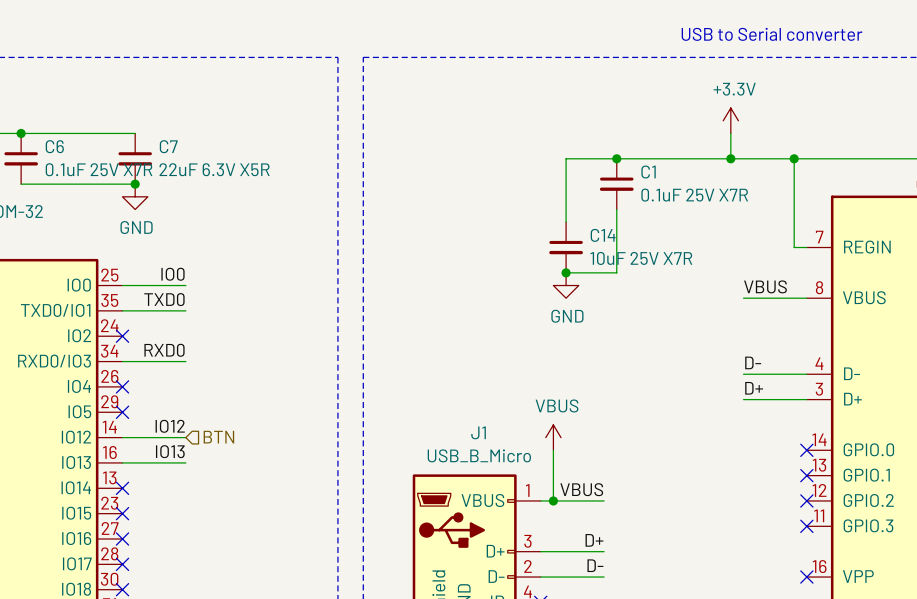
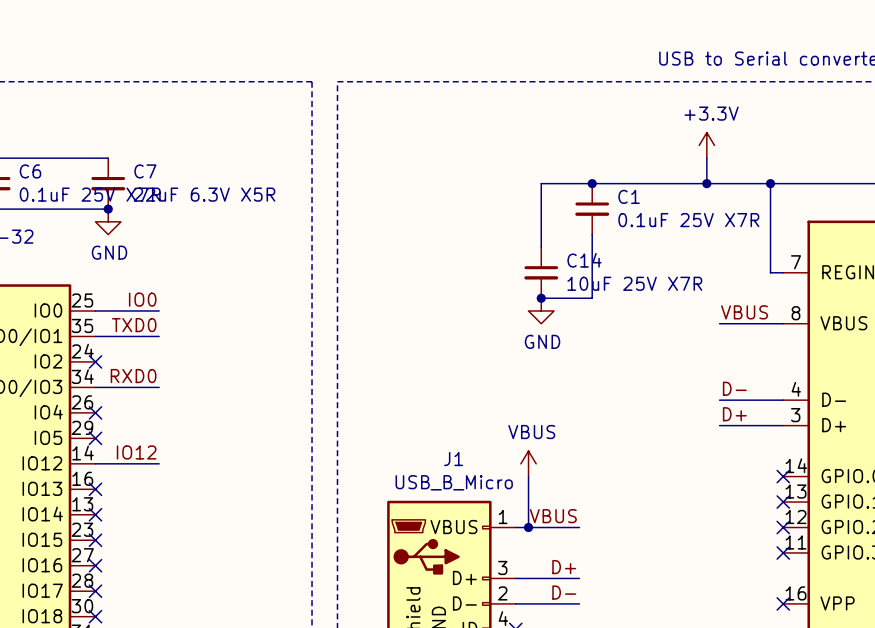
hierarchical label: BTN (218, 437) -> none
label: IO13 (170, 451) -> none
wire: (122, 462) (185, 462) -> none
no-connect mark: none -> (95, 489)

